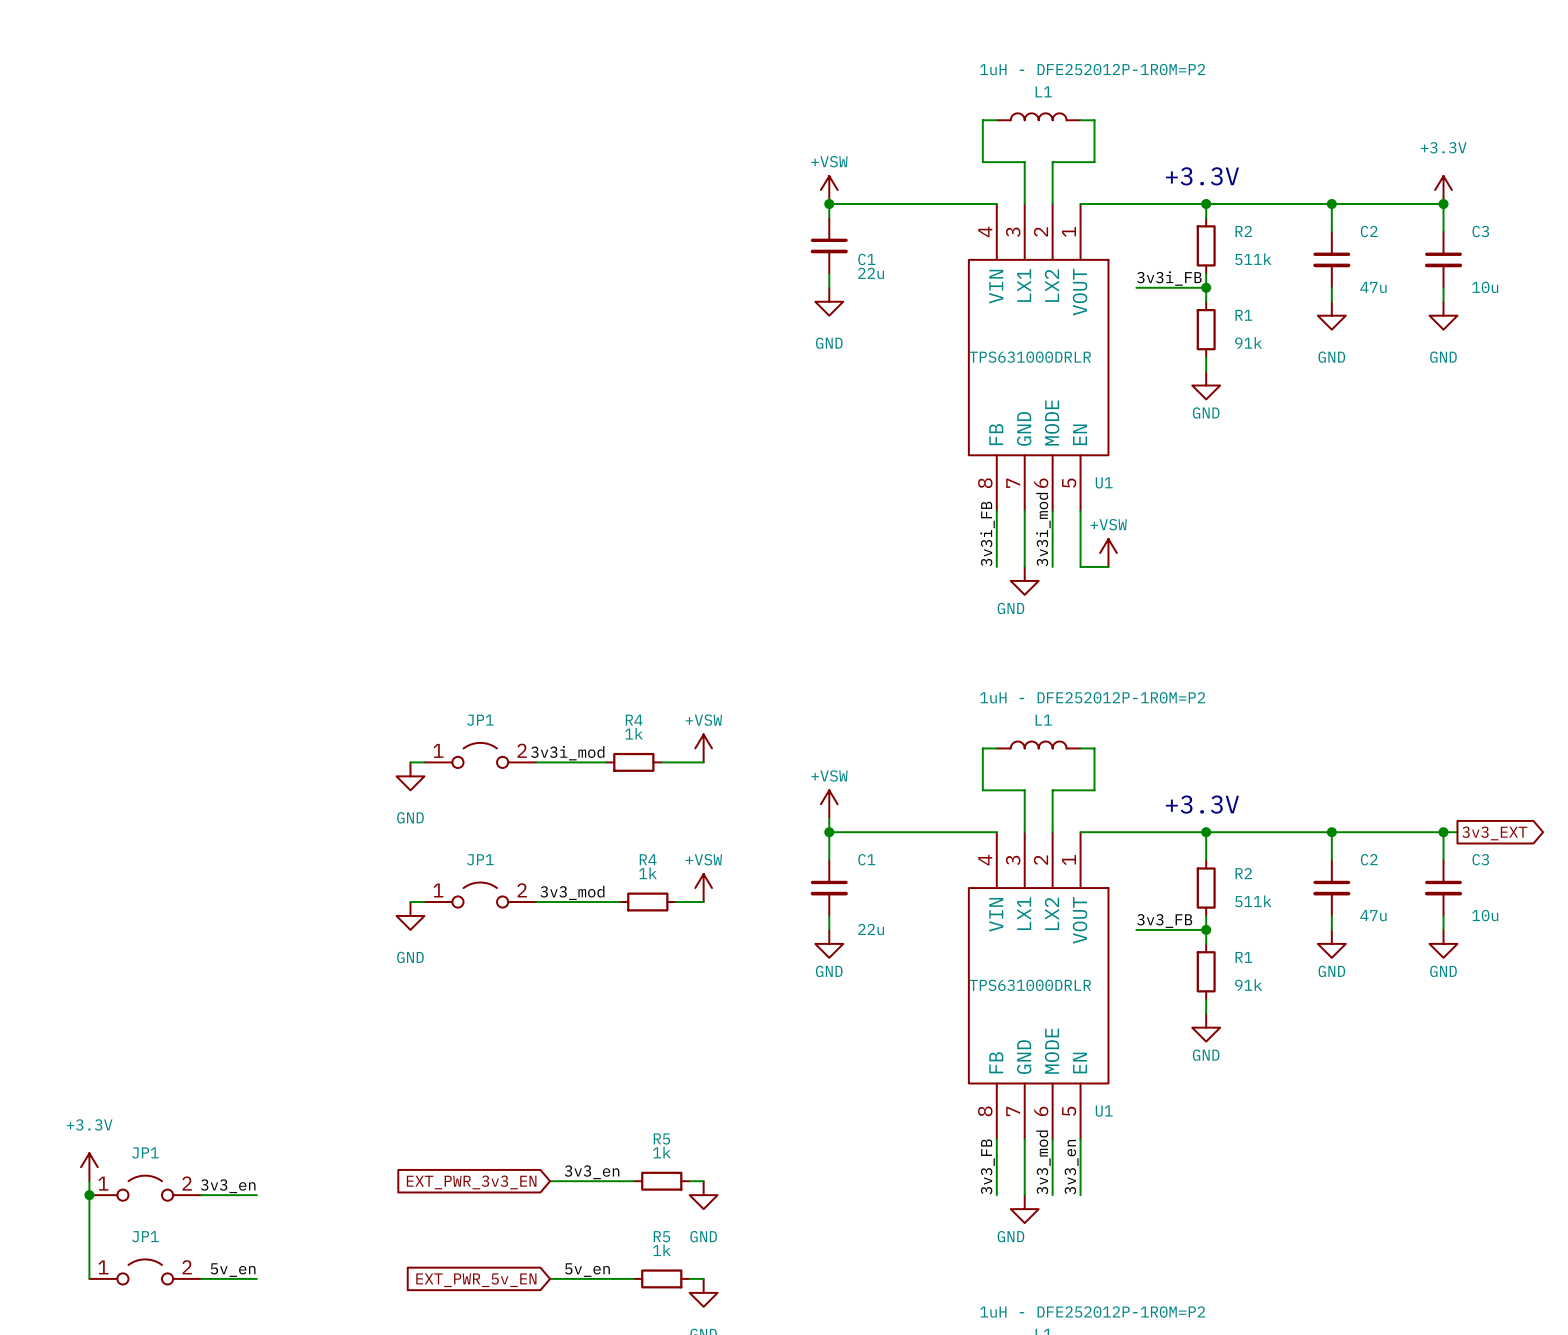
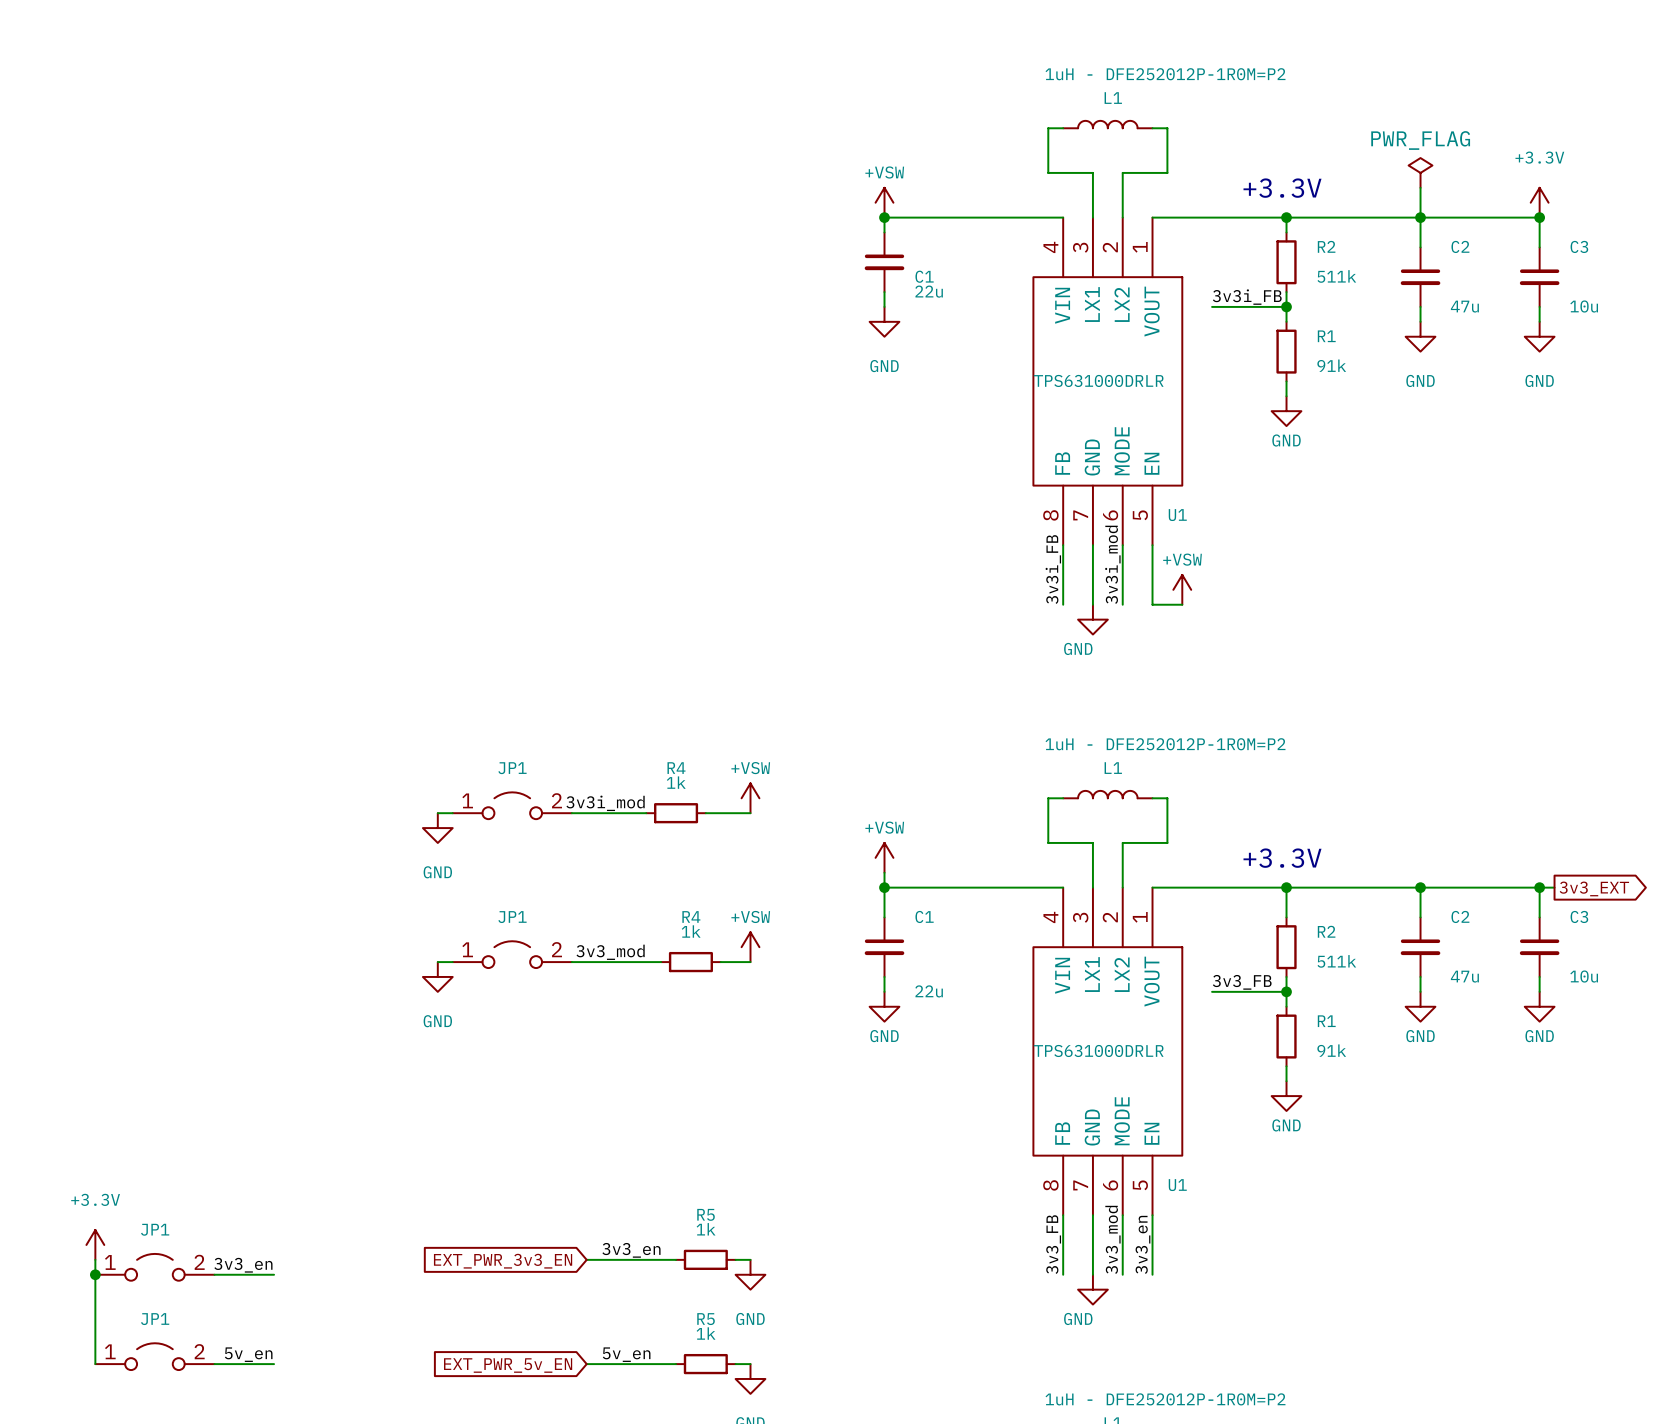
power symbol: none -> PWR_FLAG (1420, 172)
wire: none -> (1420, 187) (1420, 217)

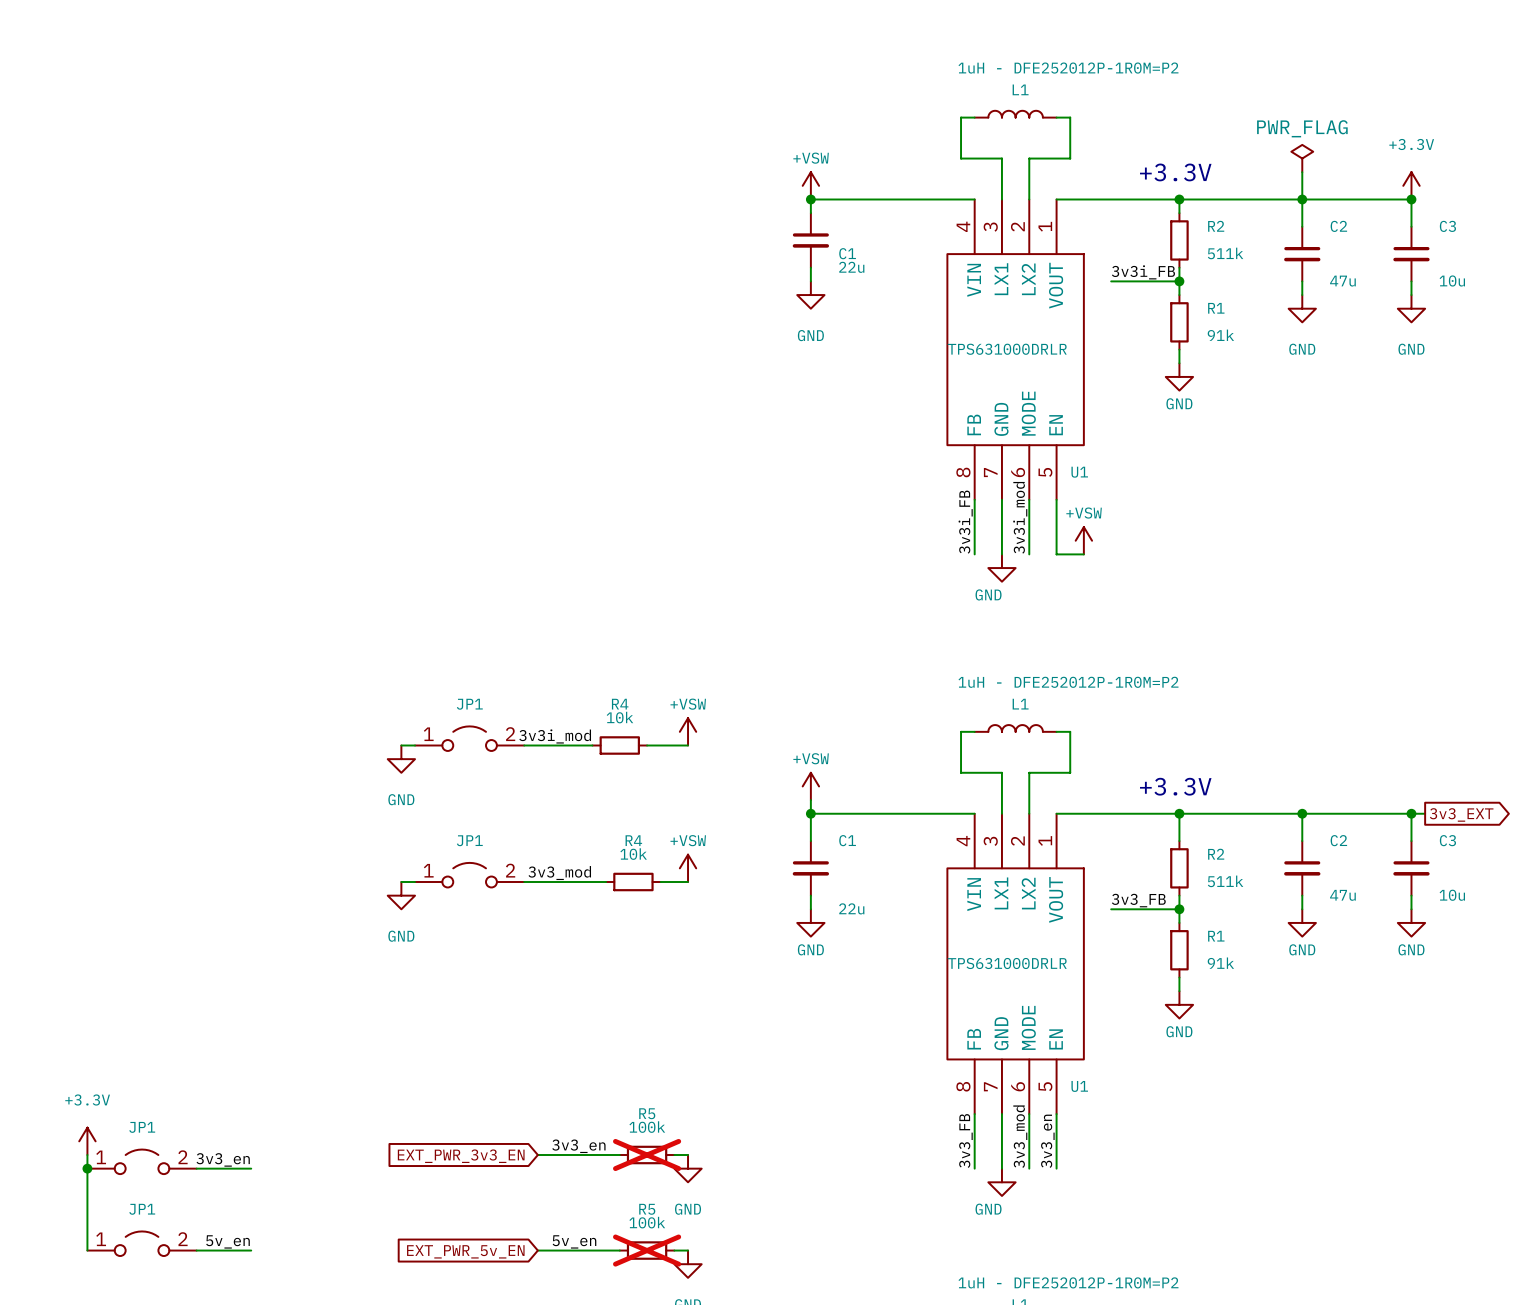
R4 value: 1k (676, 782) -> 10k (619, 717)
R4 value: 1k (691, 931) -> 10k (633, 854)
R5 value: 1k (706, 1229) -> 100k (647, 1127)
R5 do-not-place cross: none -> (647, 1155)
R5 value: 1k (706, 1333) -> 100k (647, 1222)
R5 do-not-place cross: none -> (647, 1250)

